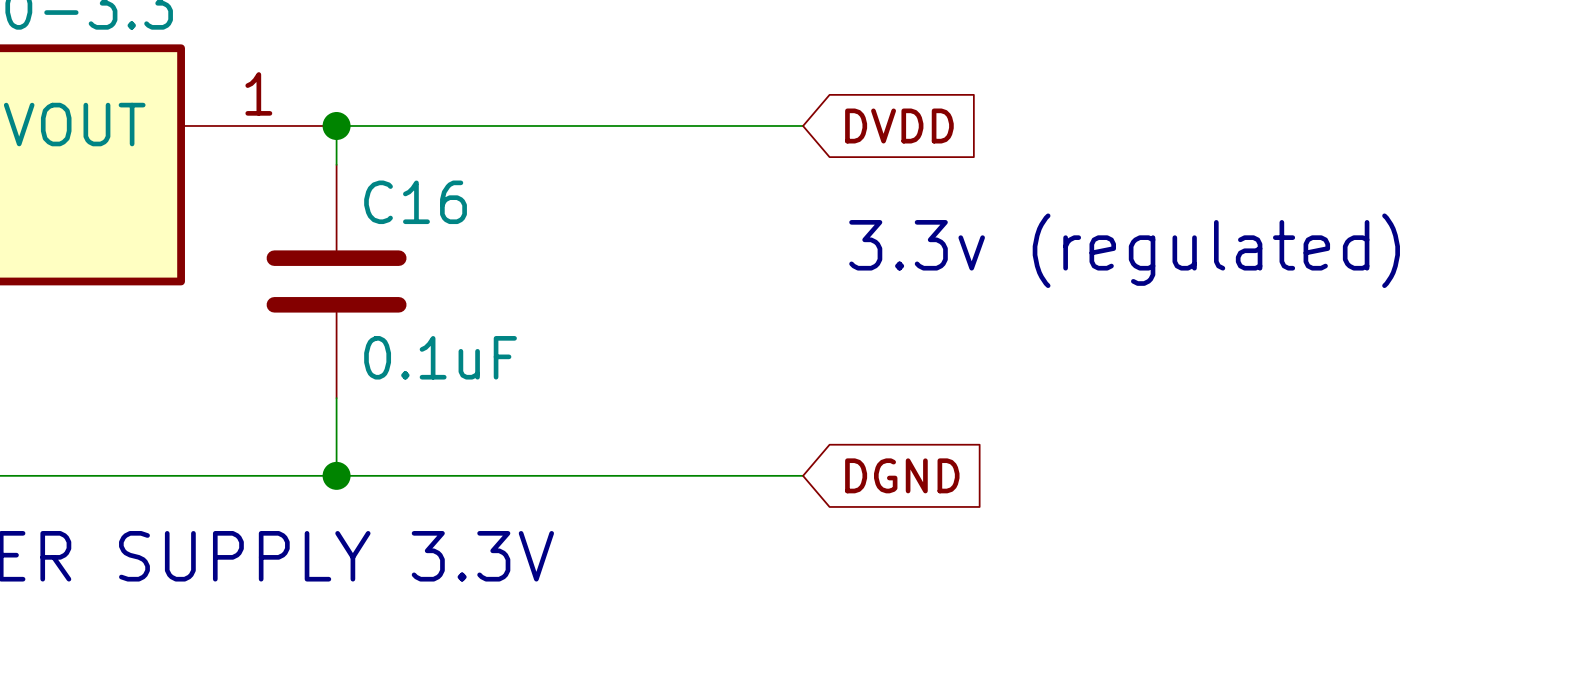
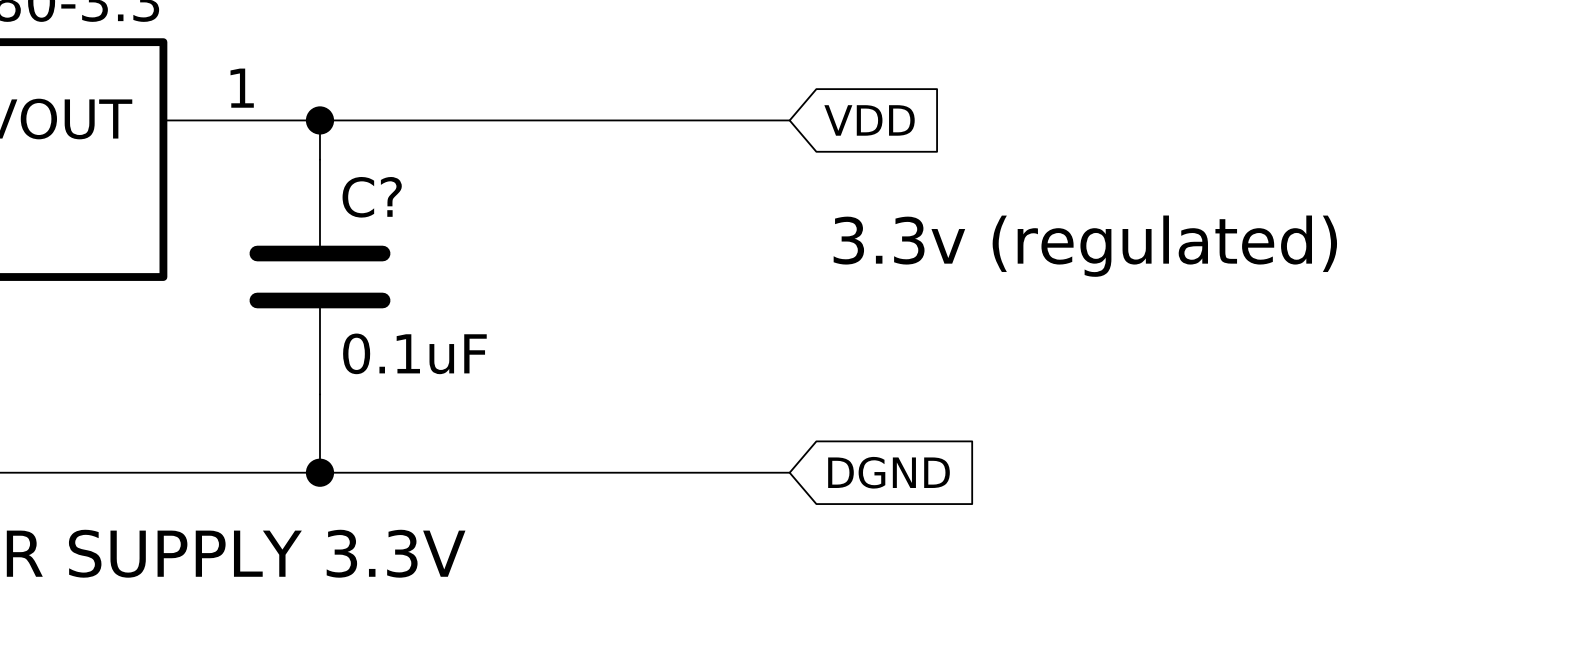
global label: DVDD (899, 125) -> VDD (869, 120)
C16 name: C16 (415, 202) -> C? (372, 197)

